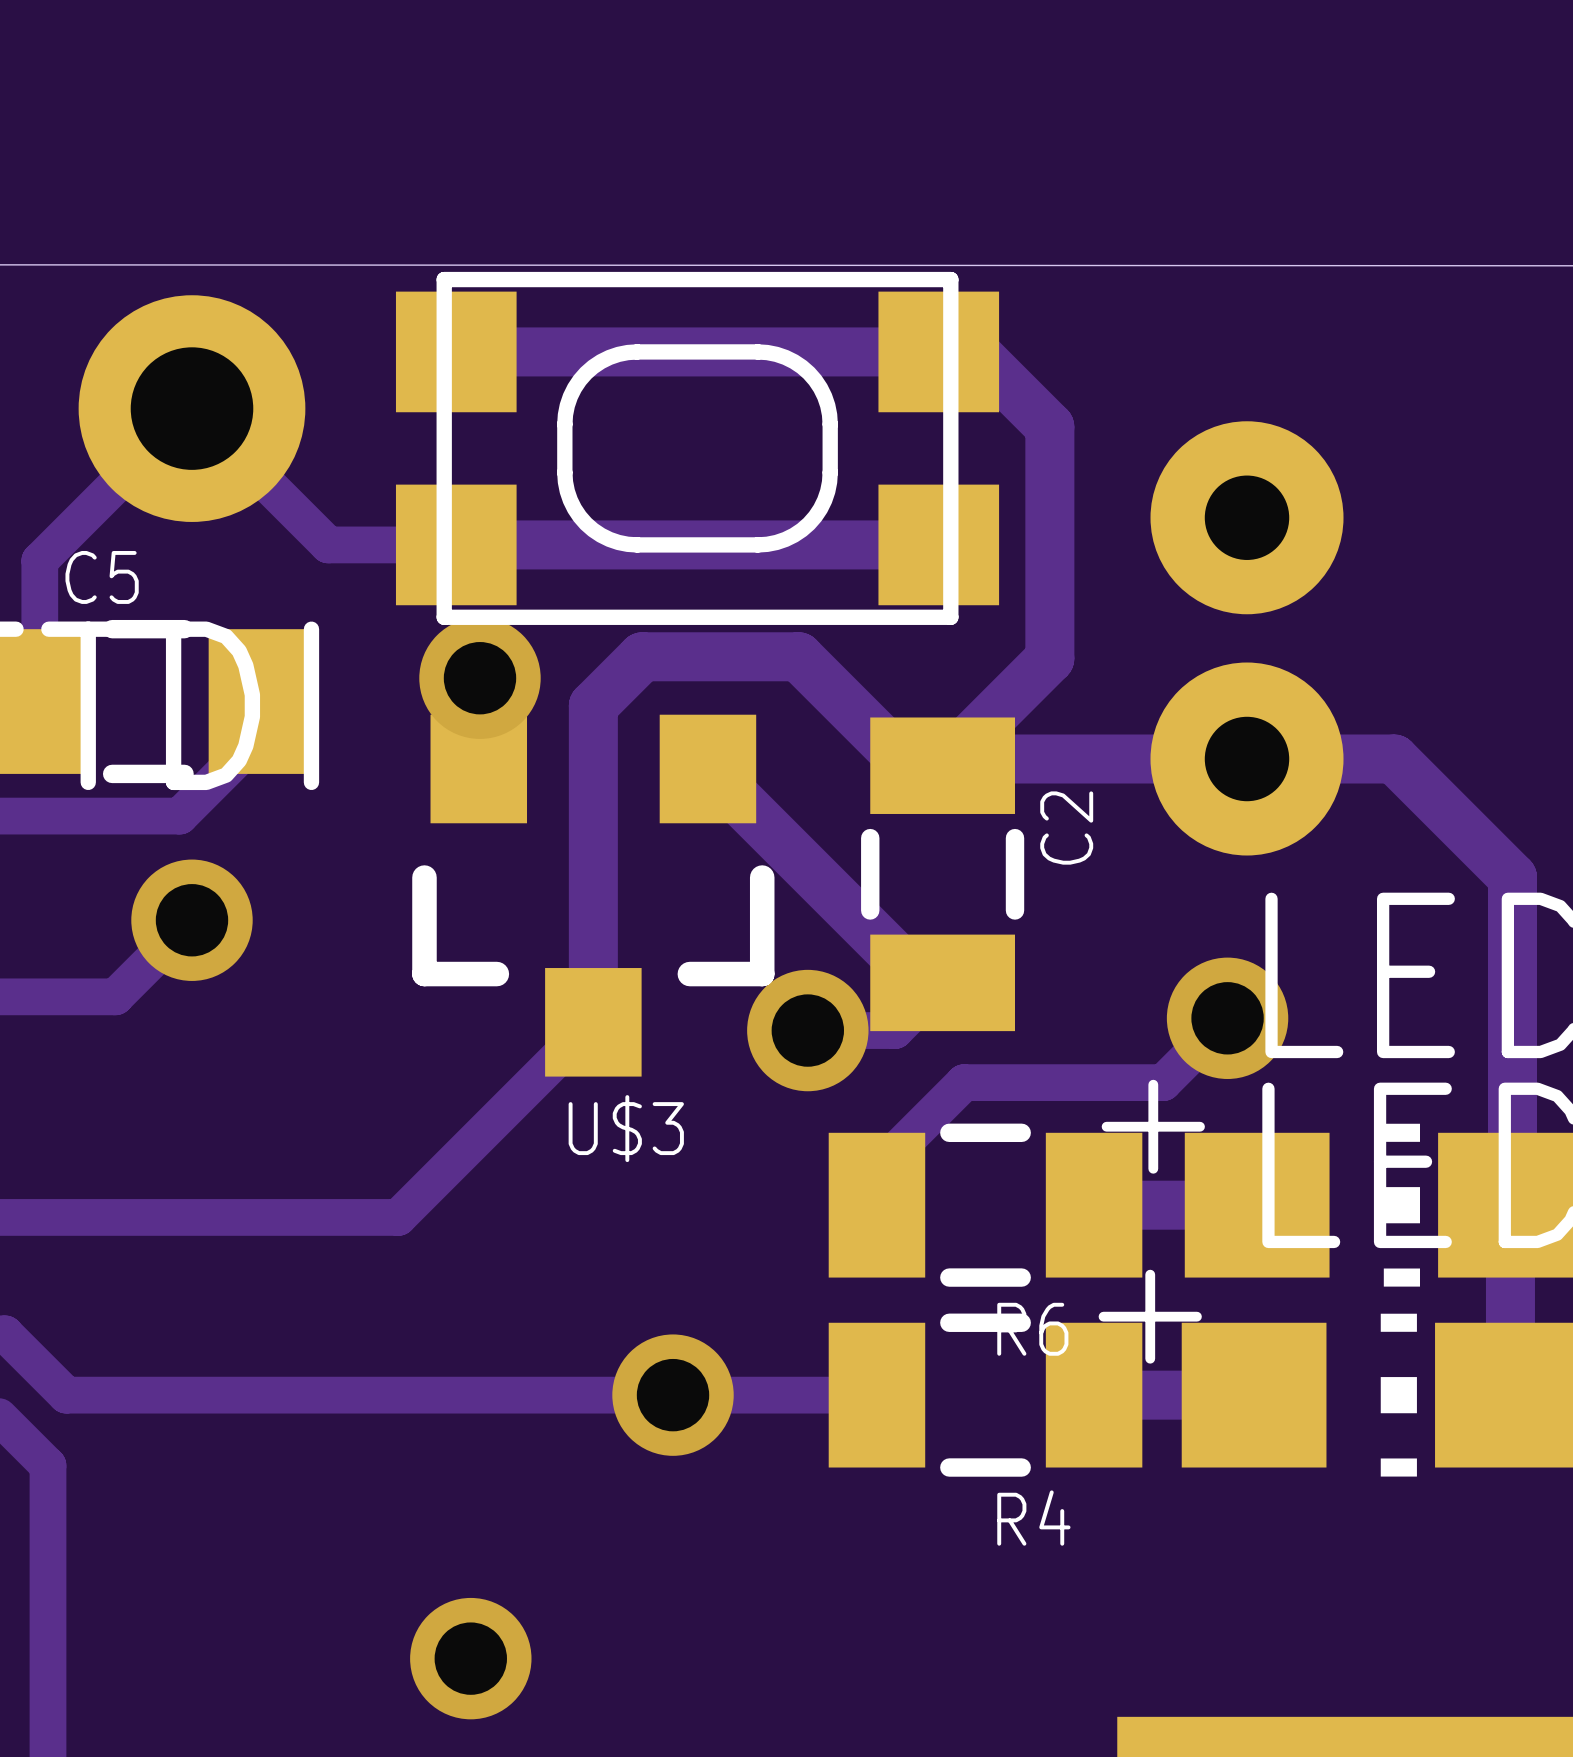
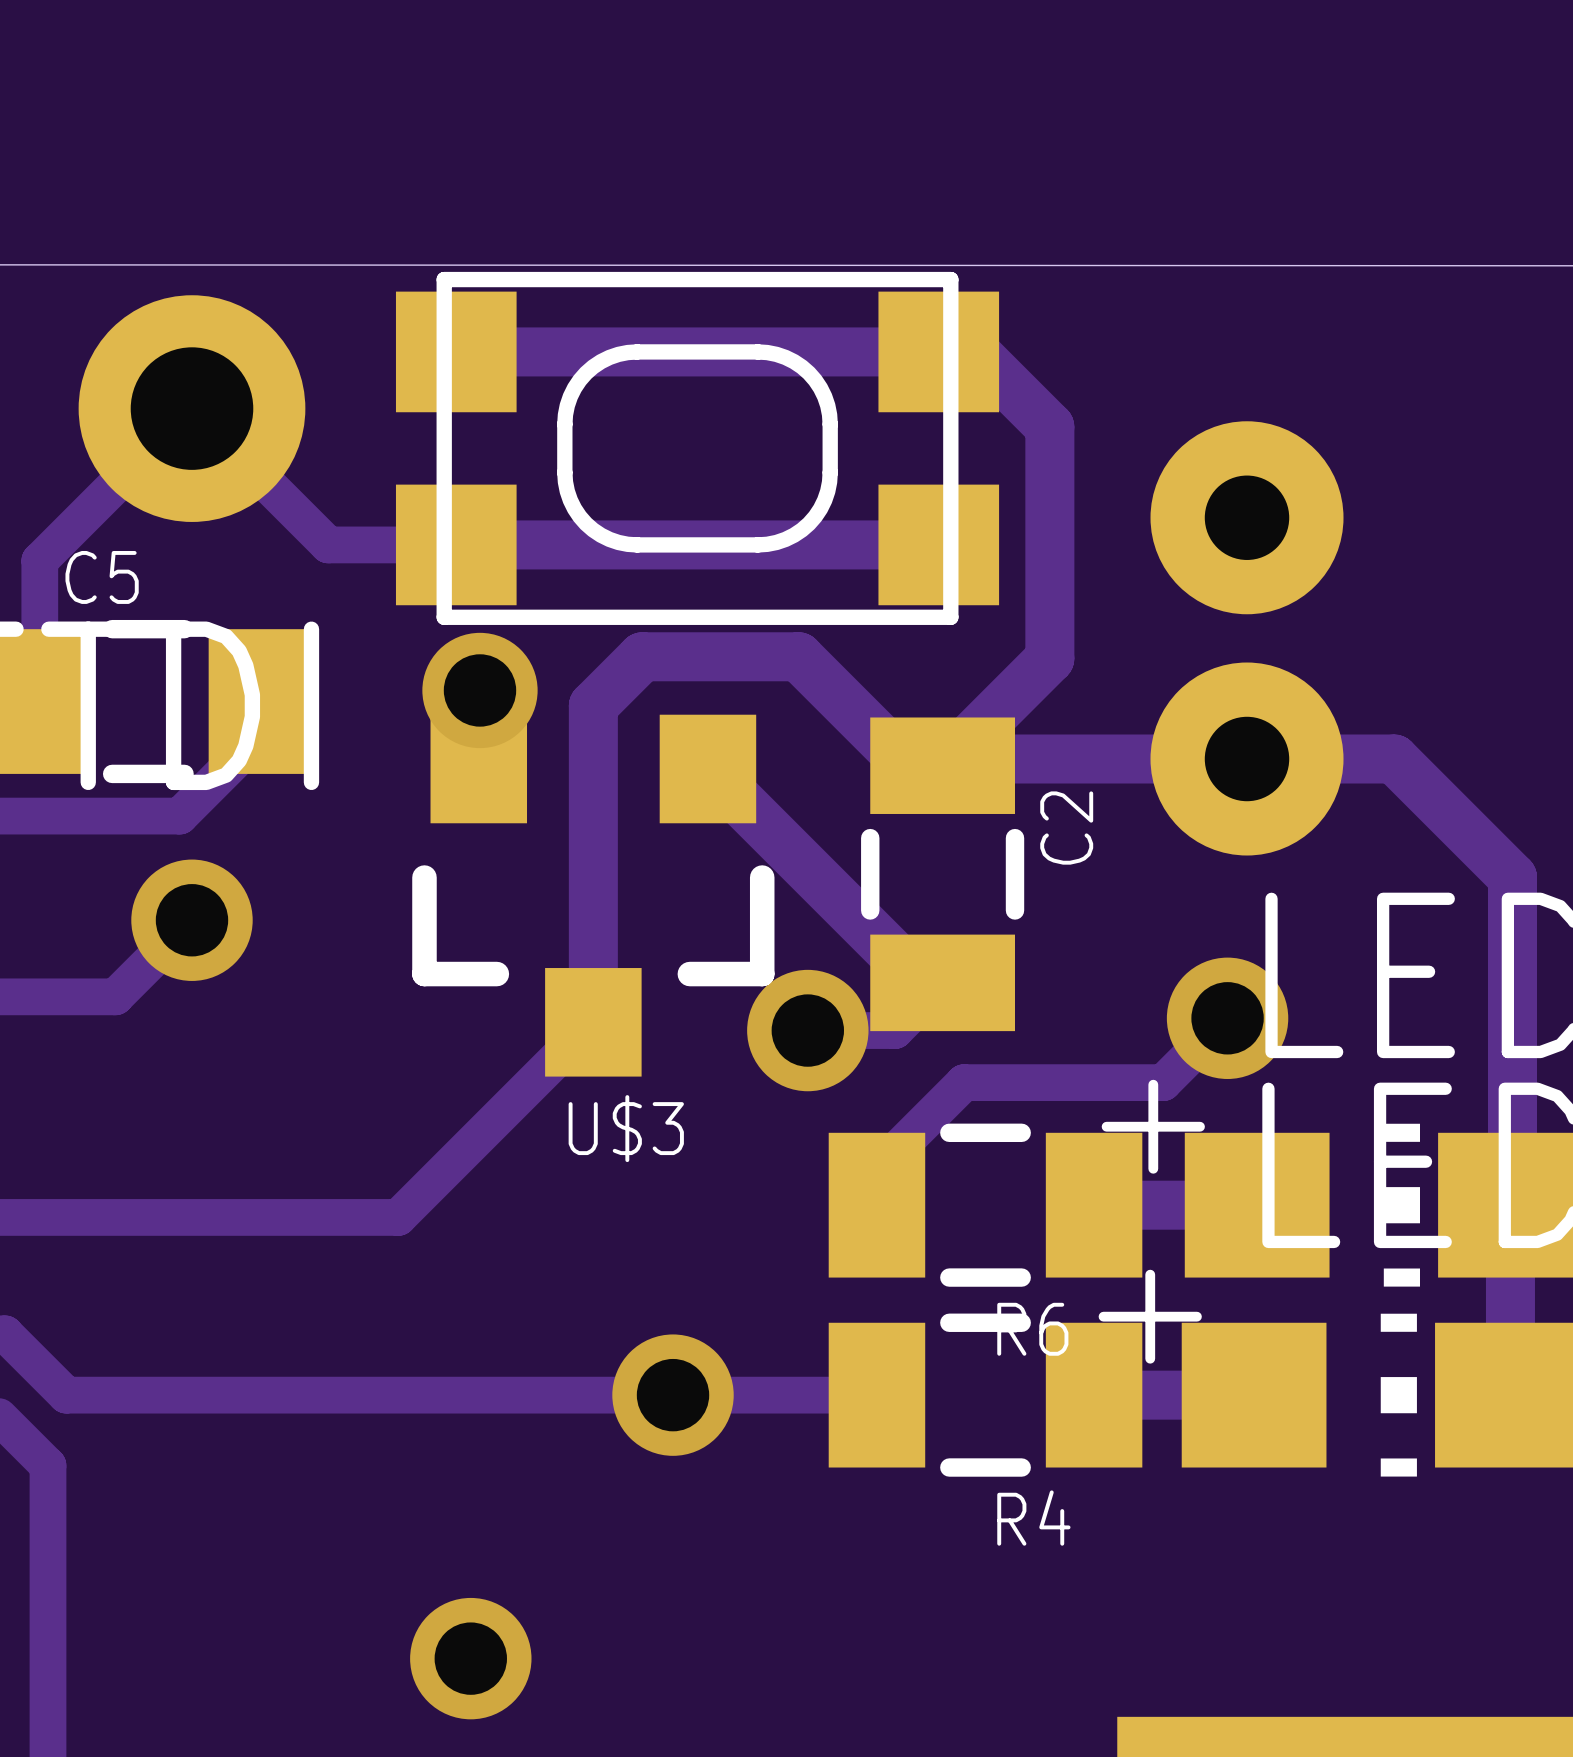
via size: [419, 617, 541, 739] -> [422, 632, 538, 749]

